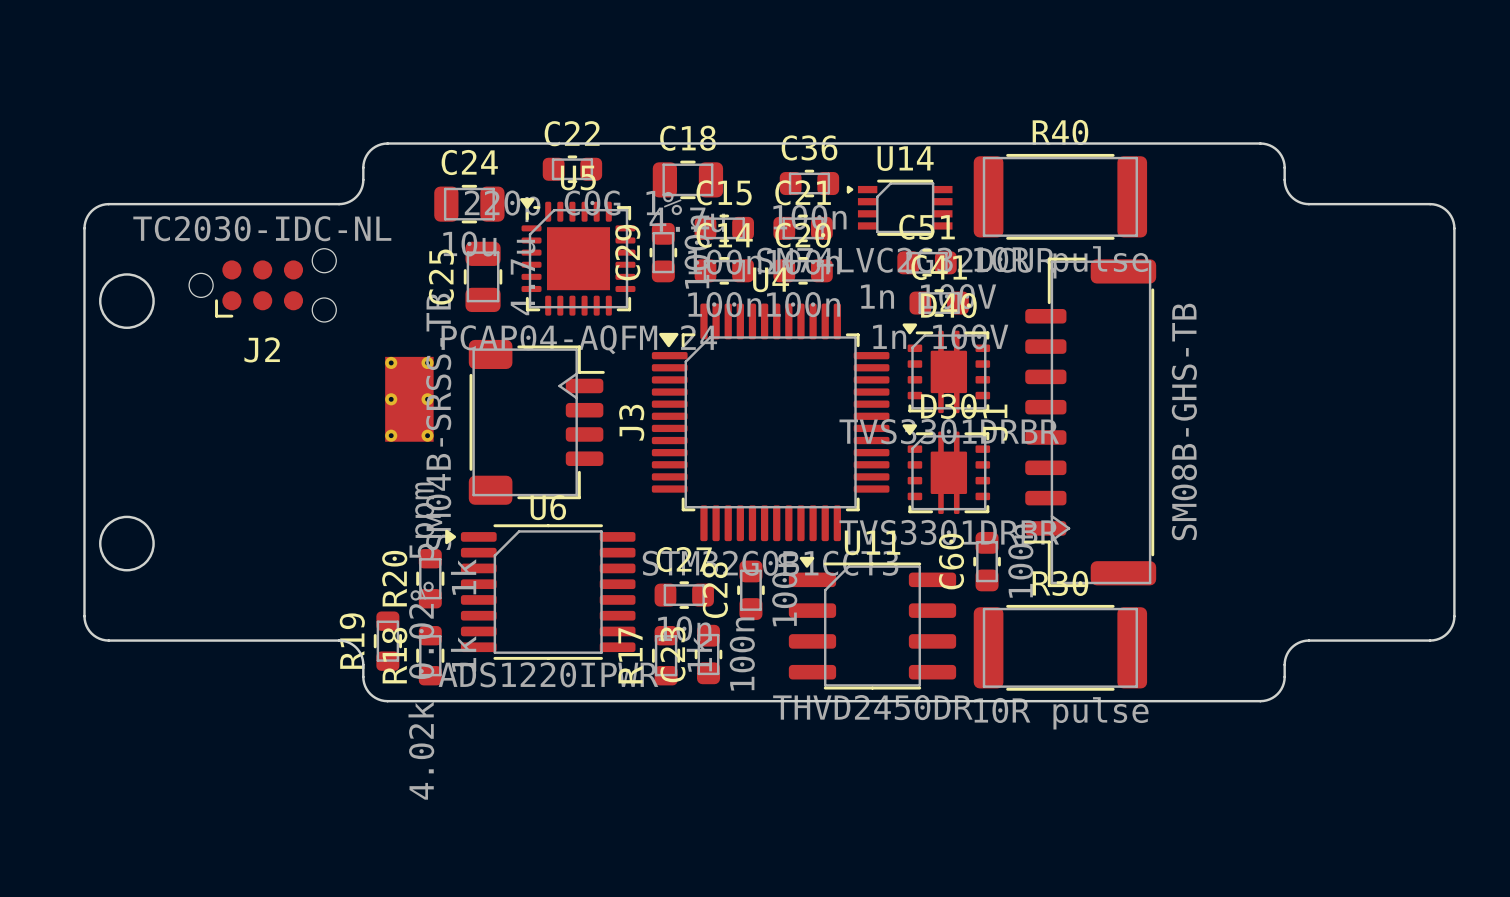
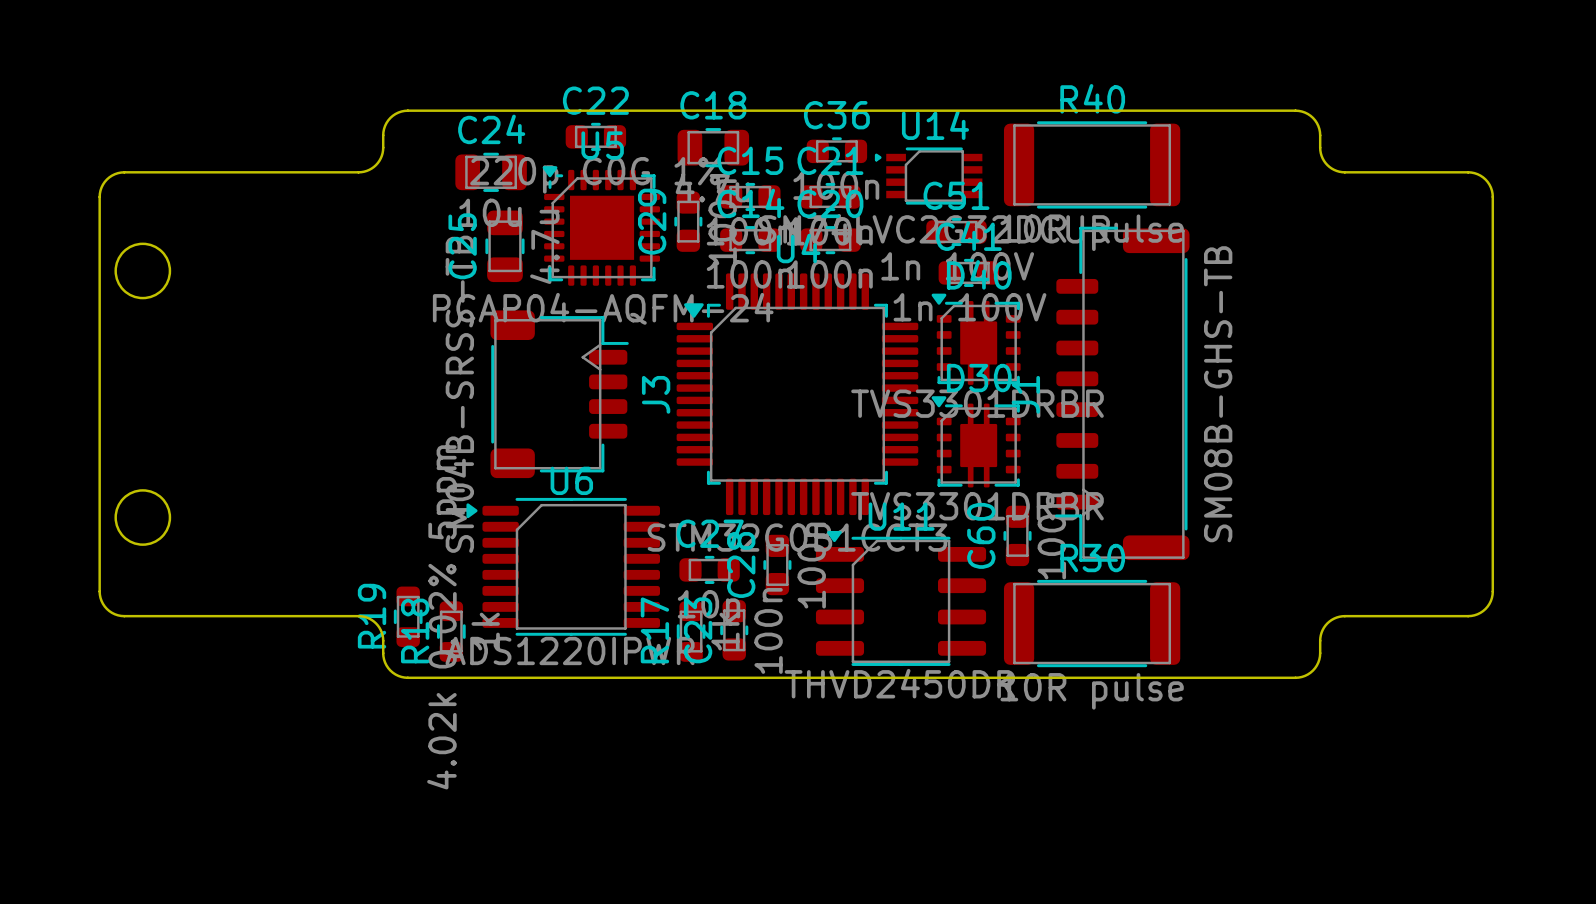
J2: TC2030-IDC-NL (262, 285) -> none
part: (409, 399) -> none
R20: 1k (430, 578) -> none

